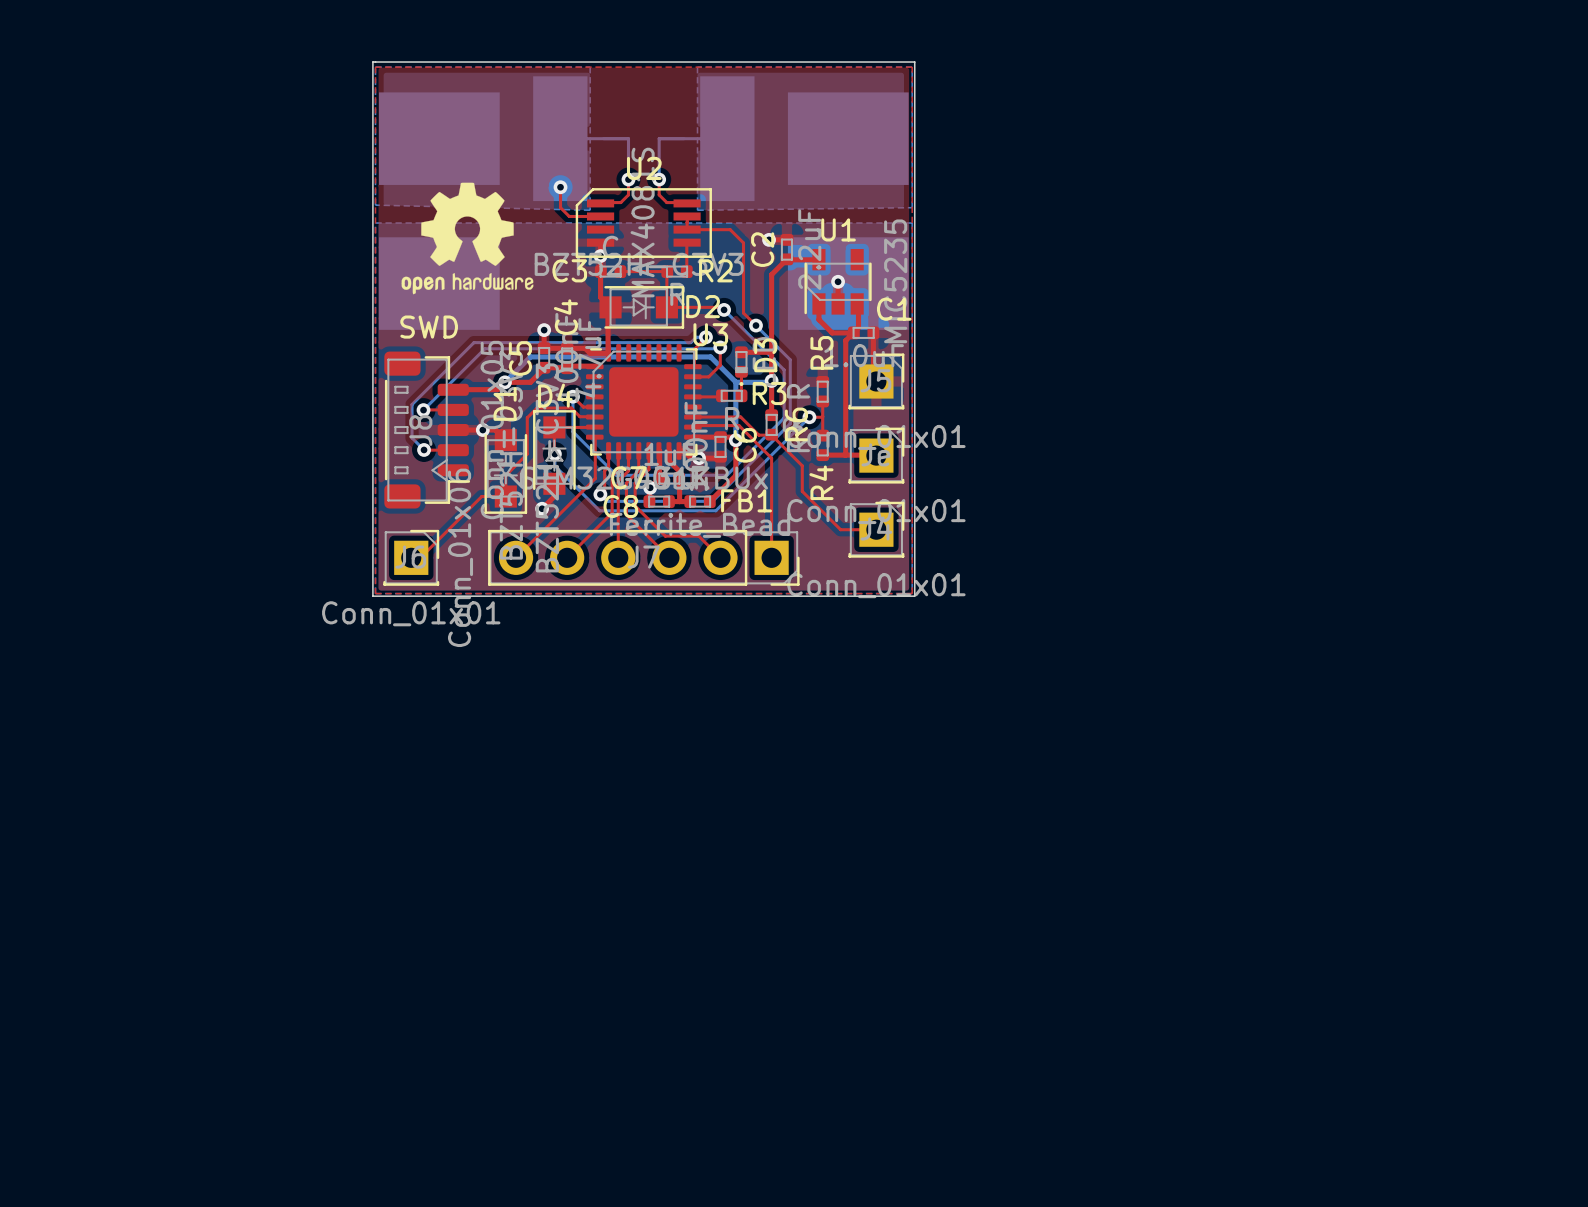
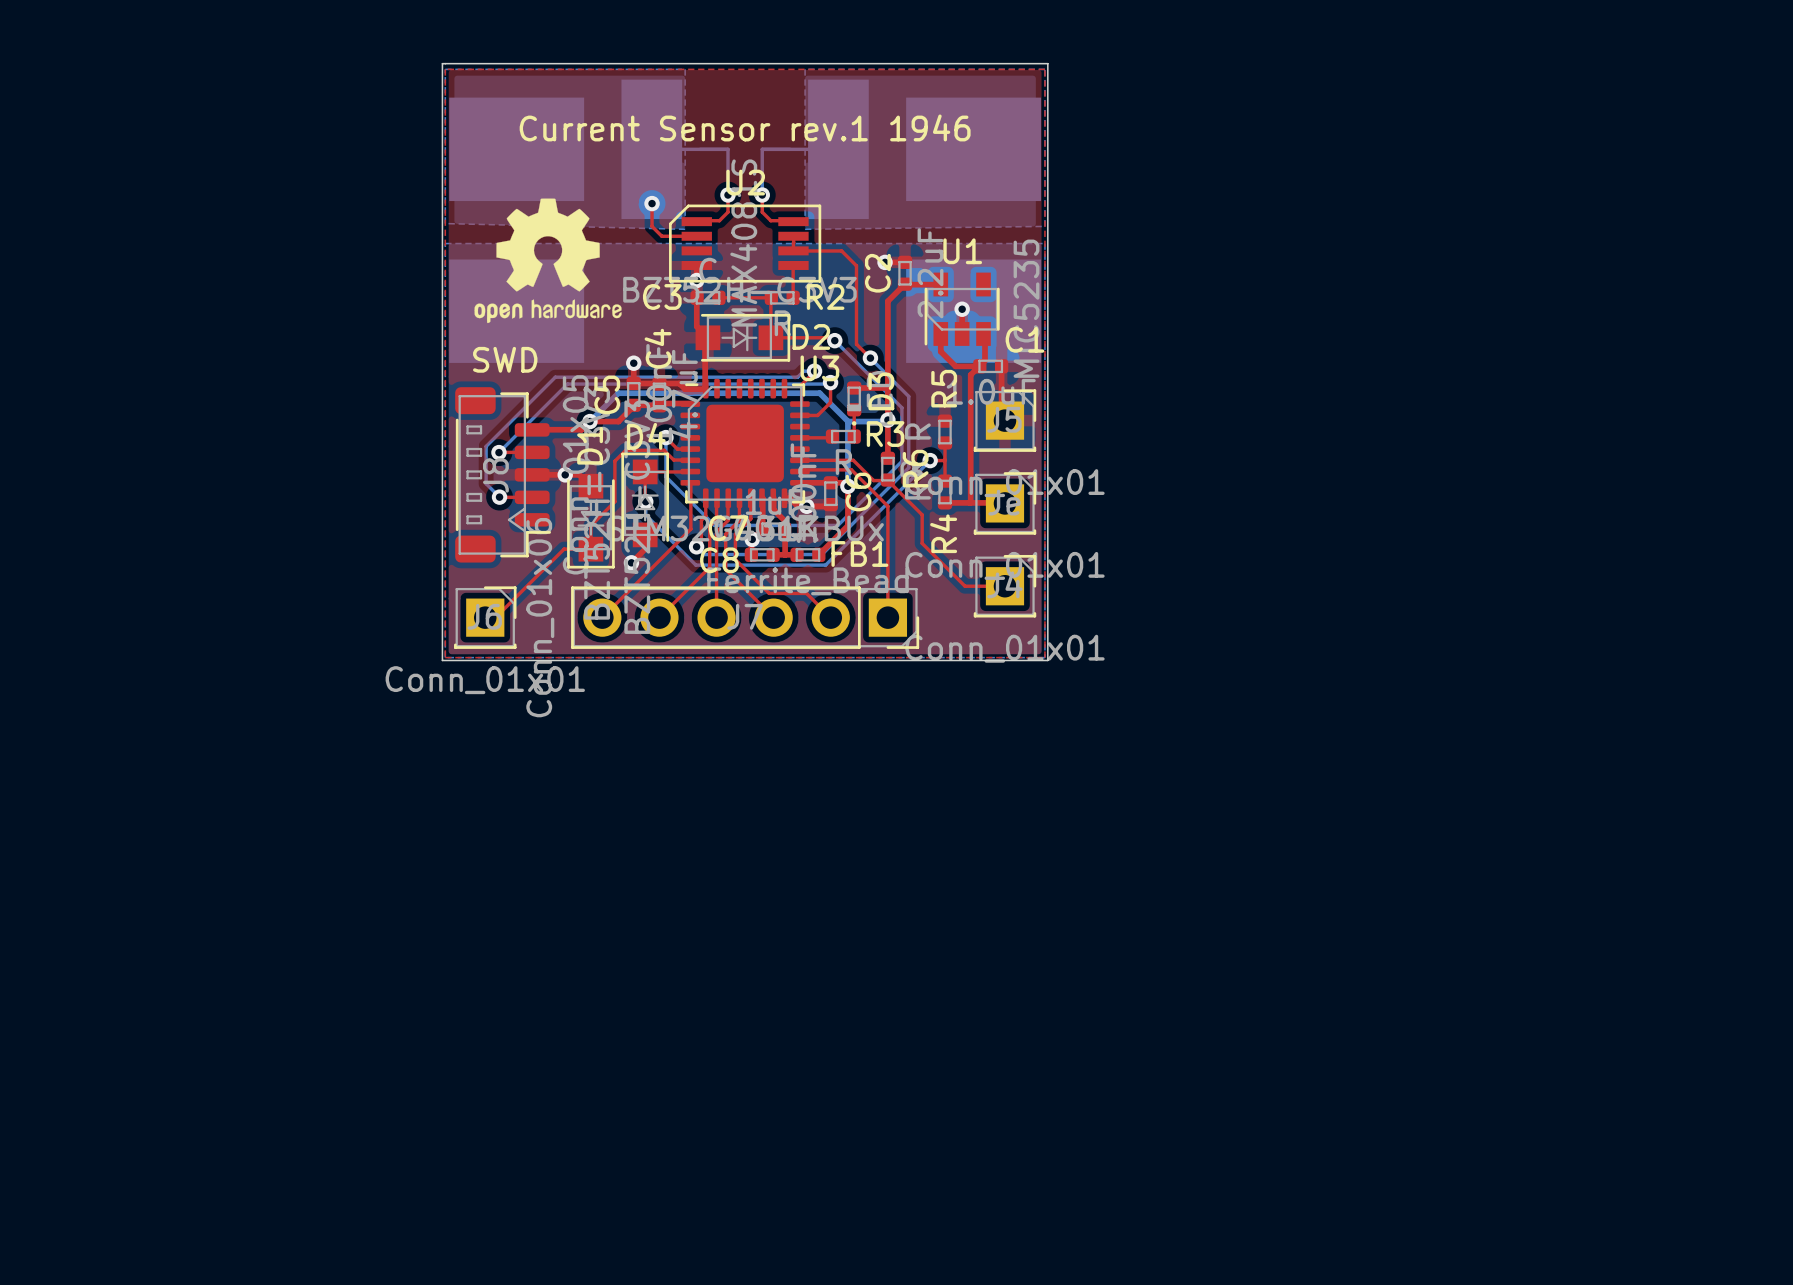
text: none -> Current Sensor rev.1 1946 (745, 127)

